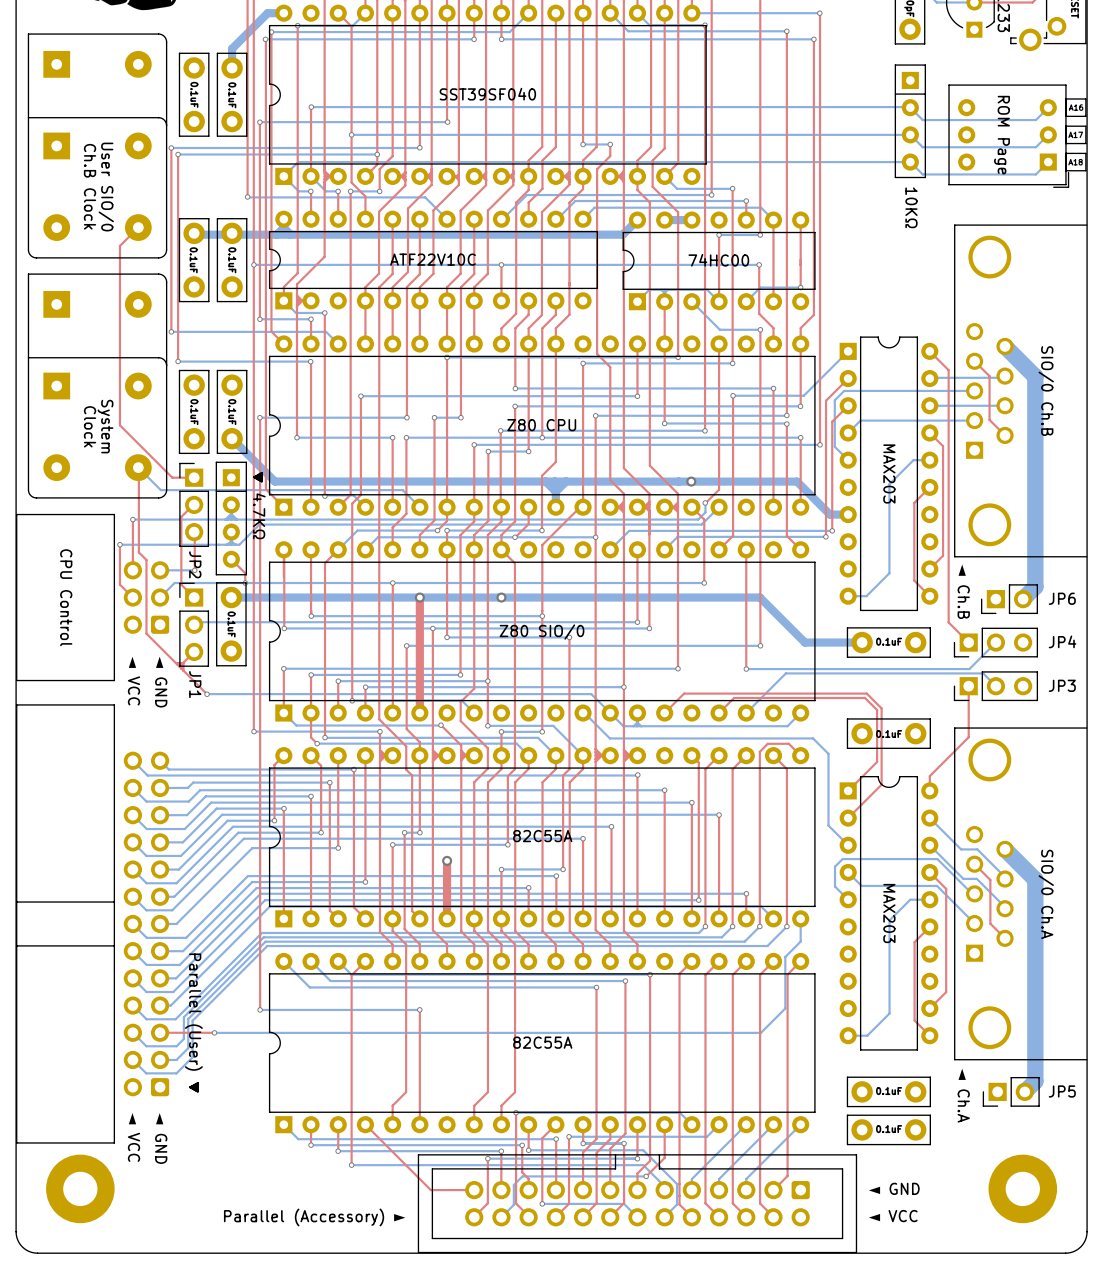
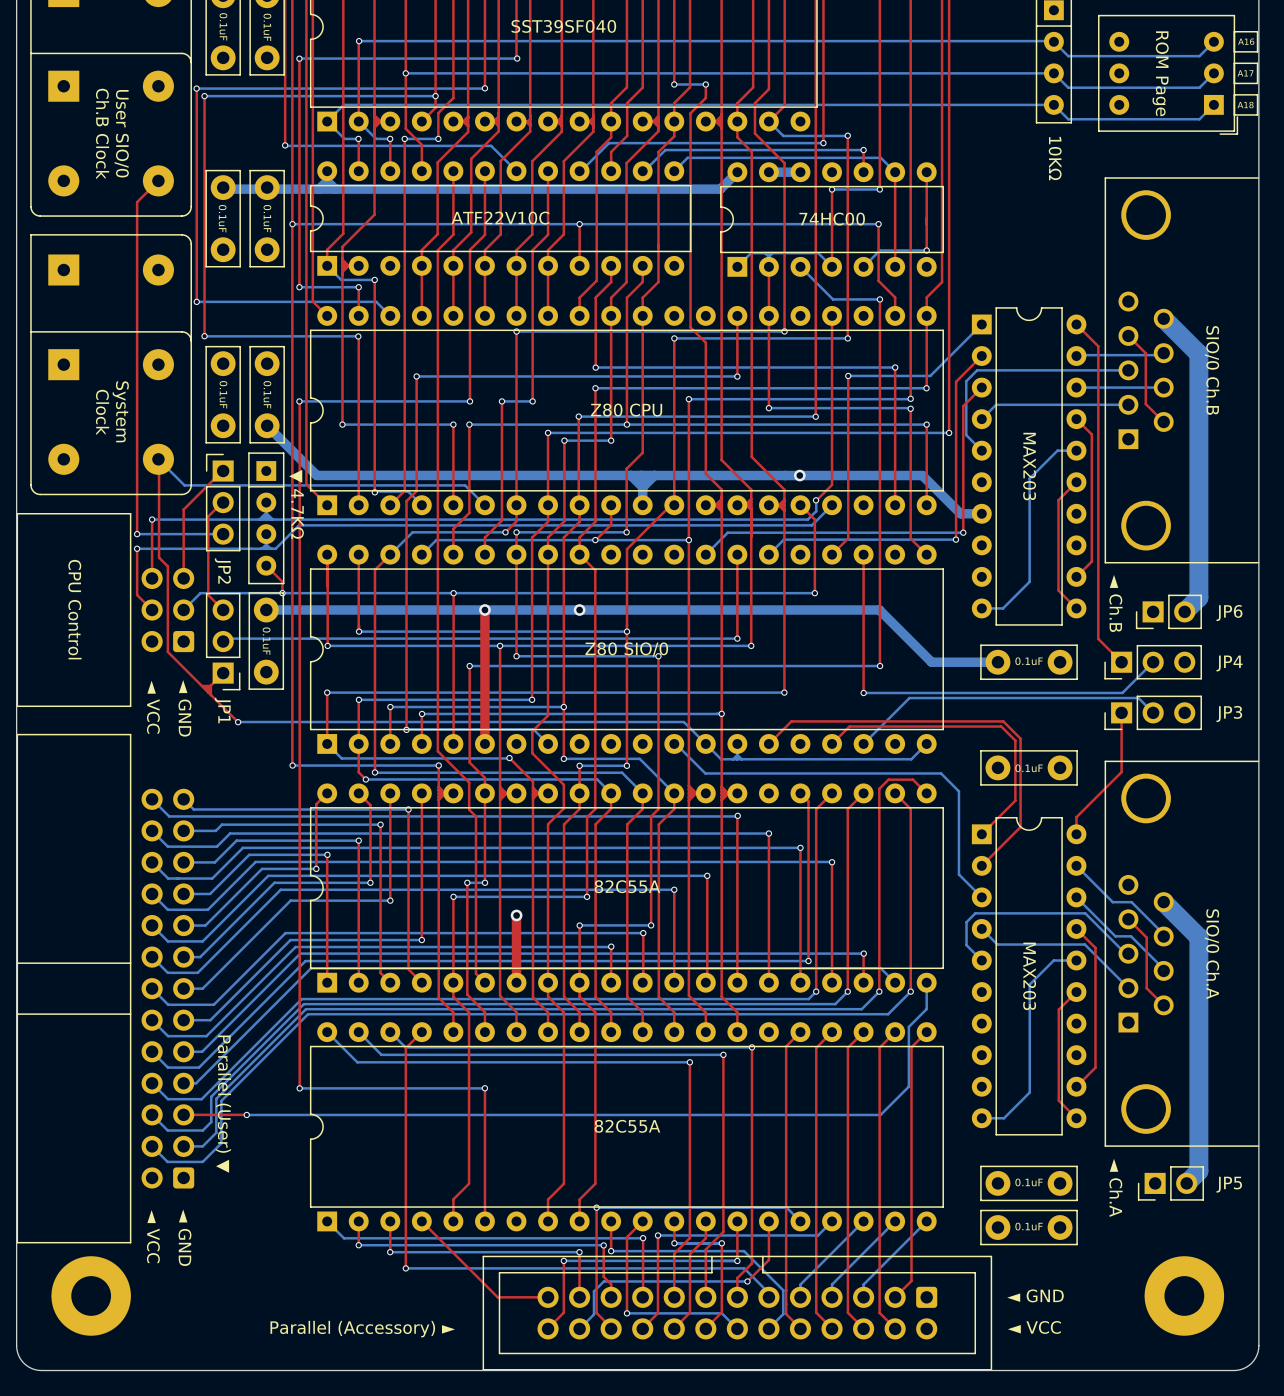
top track: (119, 425) (172, 477) (194, 477) -> (137, 410) (137, 533)
top track: none -> (221, 472) (183, 509) (183, 578)
text: ▼ 4.7KΩ (259, 505) -> none
▼ 4.7KΩ name: none -> ▼ 4.7KΩ (296, 504)
bottom track: none -> (137, 534) (222, 534)
via: none -> (137, 534)
top track: (194, 532) (194, 570) -> none
bottom track: (160, 570) (194, 570) -> none
via: (194, 570) -> none
JP1 rotation: 0° (194, 624) -> 180° (223, 641)

